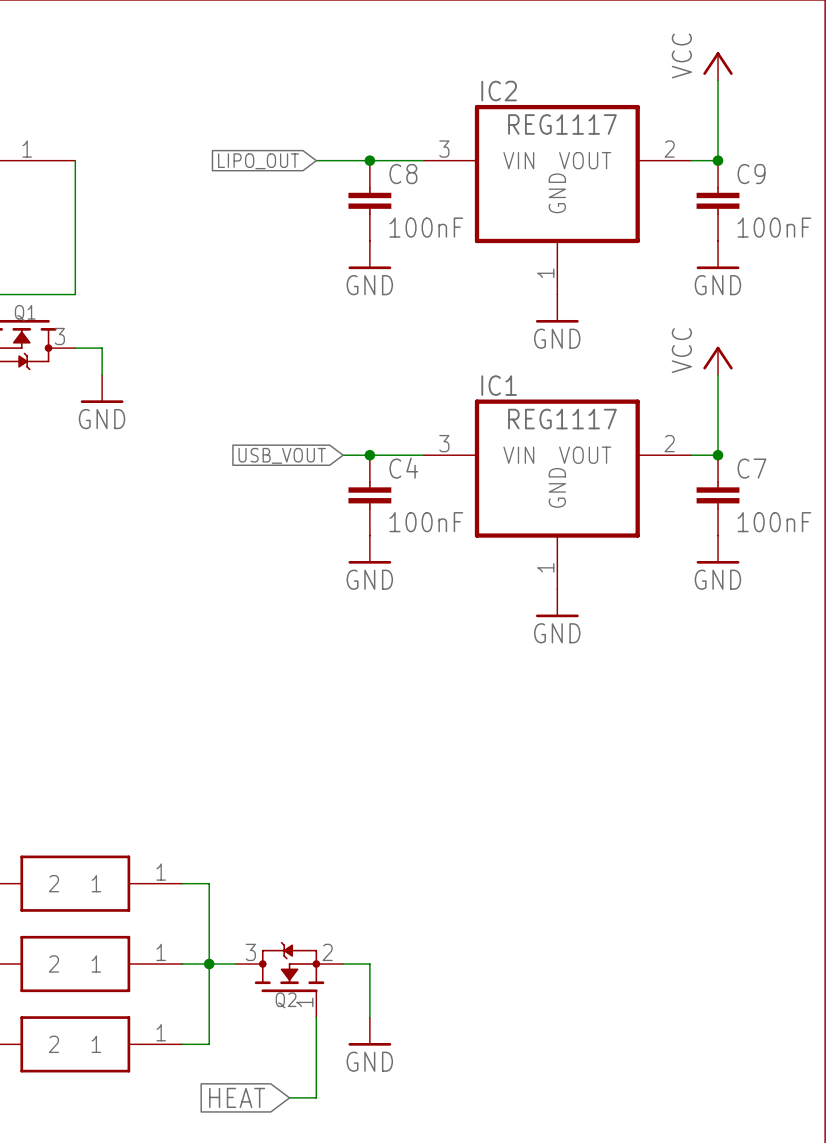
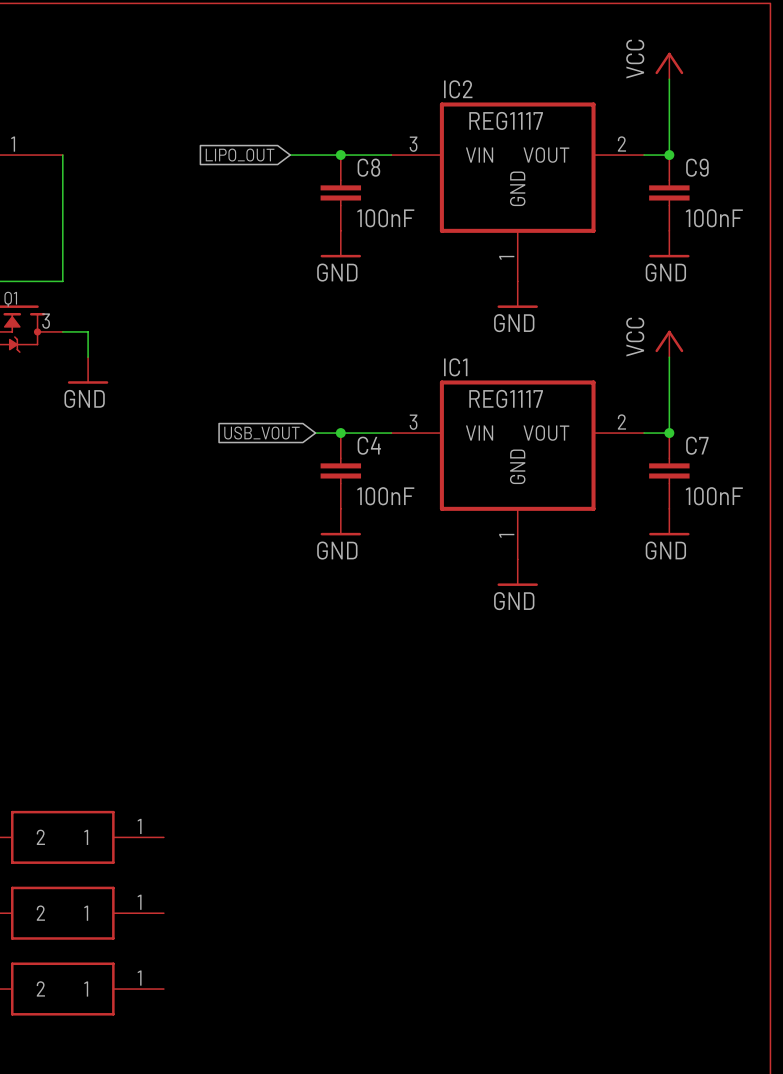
wire: (182, 883) (209, 883) (209, 1044) (182, 1044) -> none
wire: (182, 964) (236, 964) -> none
junction: (209, 964) -> none
wire: (343, 964) (369, 964) (369, 1017) -> none
Q2: (289, 979) -> none
wire: (316, 1017) (316, 1097) (289, 1097) -> none
power symbol: GND (369, 1031) -> none
global label: HEAT (237, 1097) -> none

